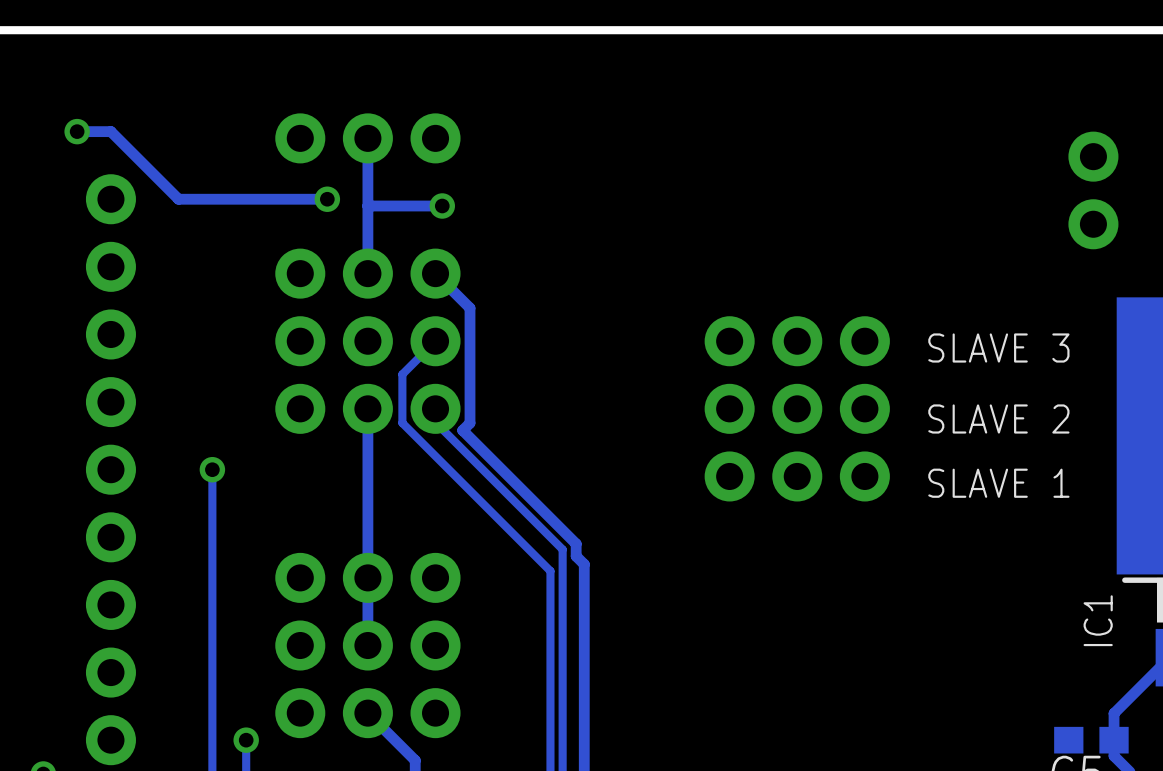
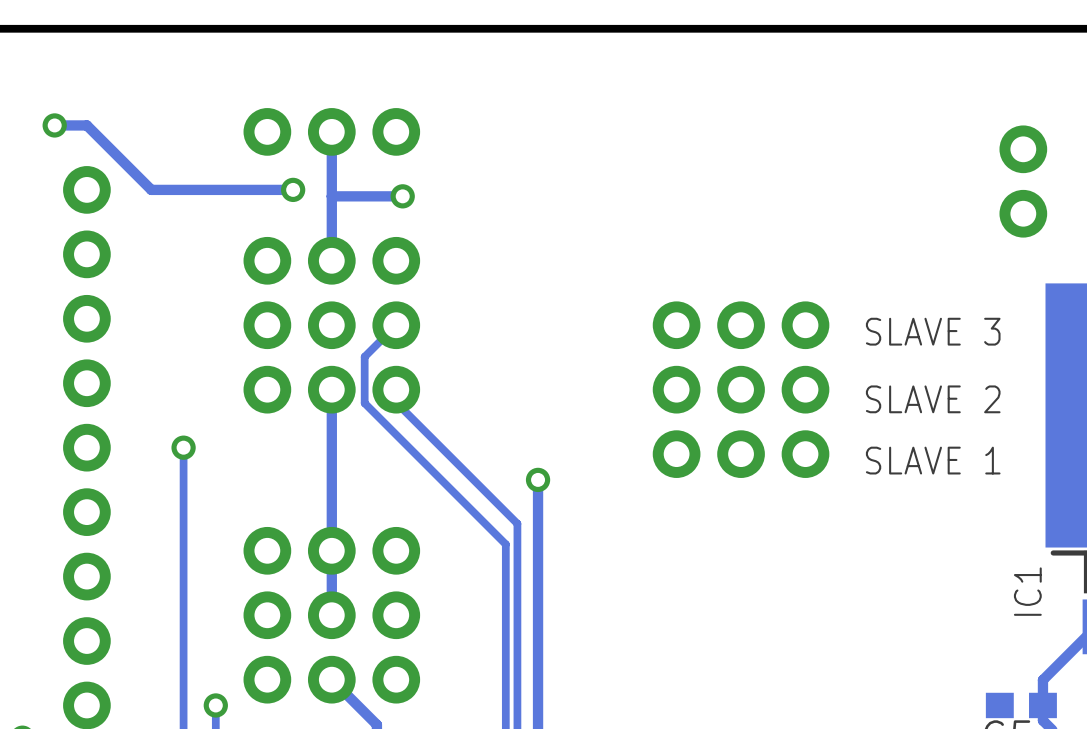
track: (435, 273) (470, 308) (470, 423) (462, 430) (576, 543) (576, 556) (584, 564) -> (538, 479) (538, 537)
via: none -> (538, 479)

